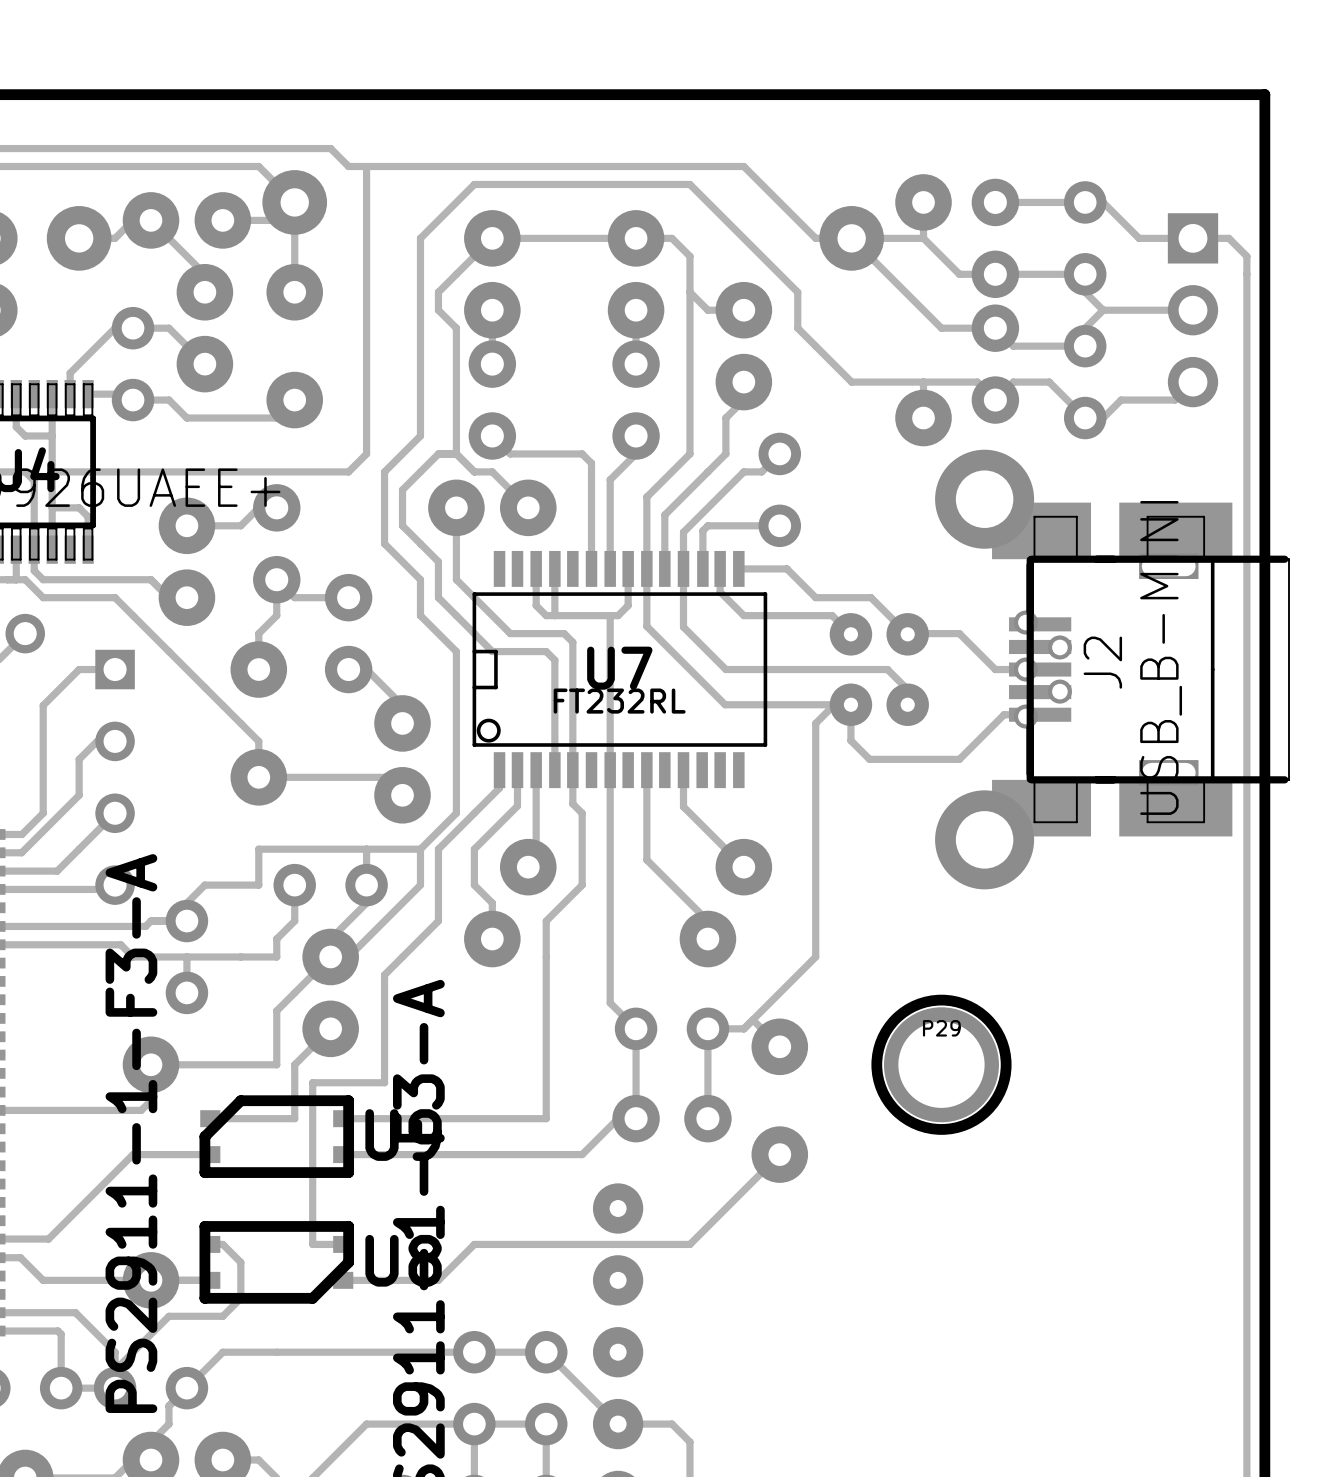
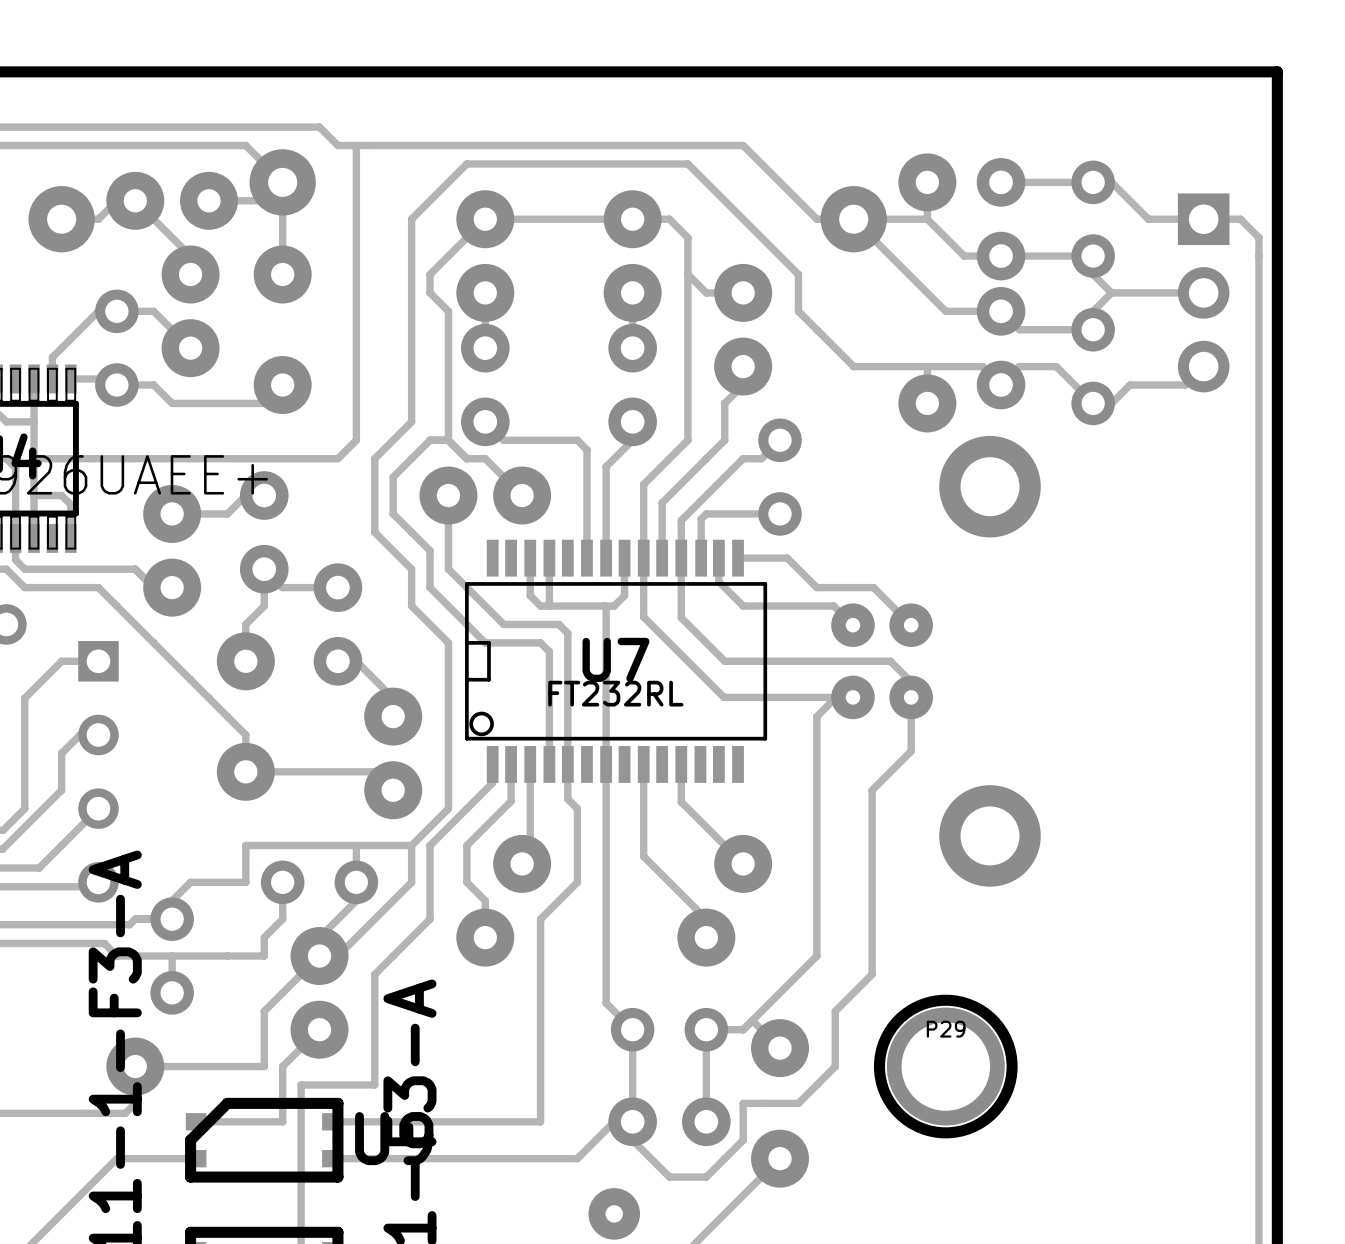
track: (907, 634) (959, 633) (995, 669) (1040, 669) -> none
J2: USB_B-MINI (1140, 669) -> none
track: (850, 704) (850, 740) (869, 759) (959, 759) (1004, 714) (1040, 714) -> none
track: none -> (911, 697) (911, 751) (872, 790) (872, 974) (835, 1011) (835, 1066) (798, 1103) (743, 1103) (743, 1140) (706, 1177) (669, 1177) (632, 1140) (632, 1121)

